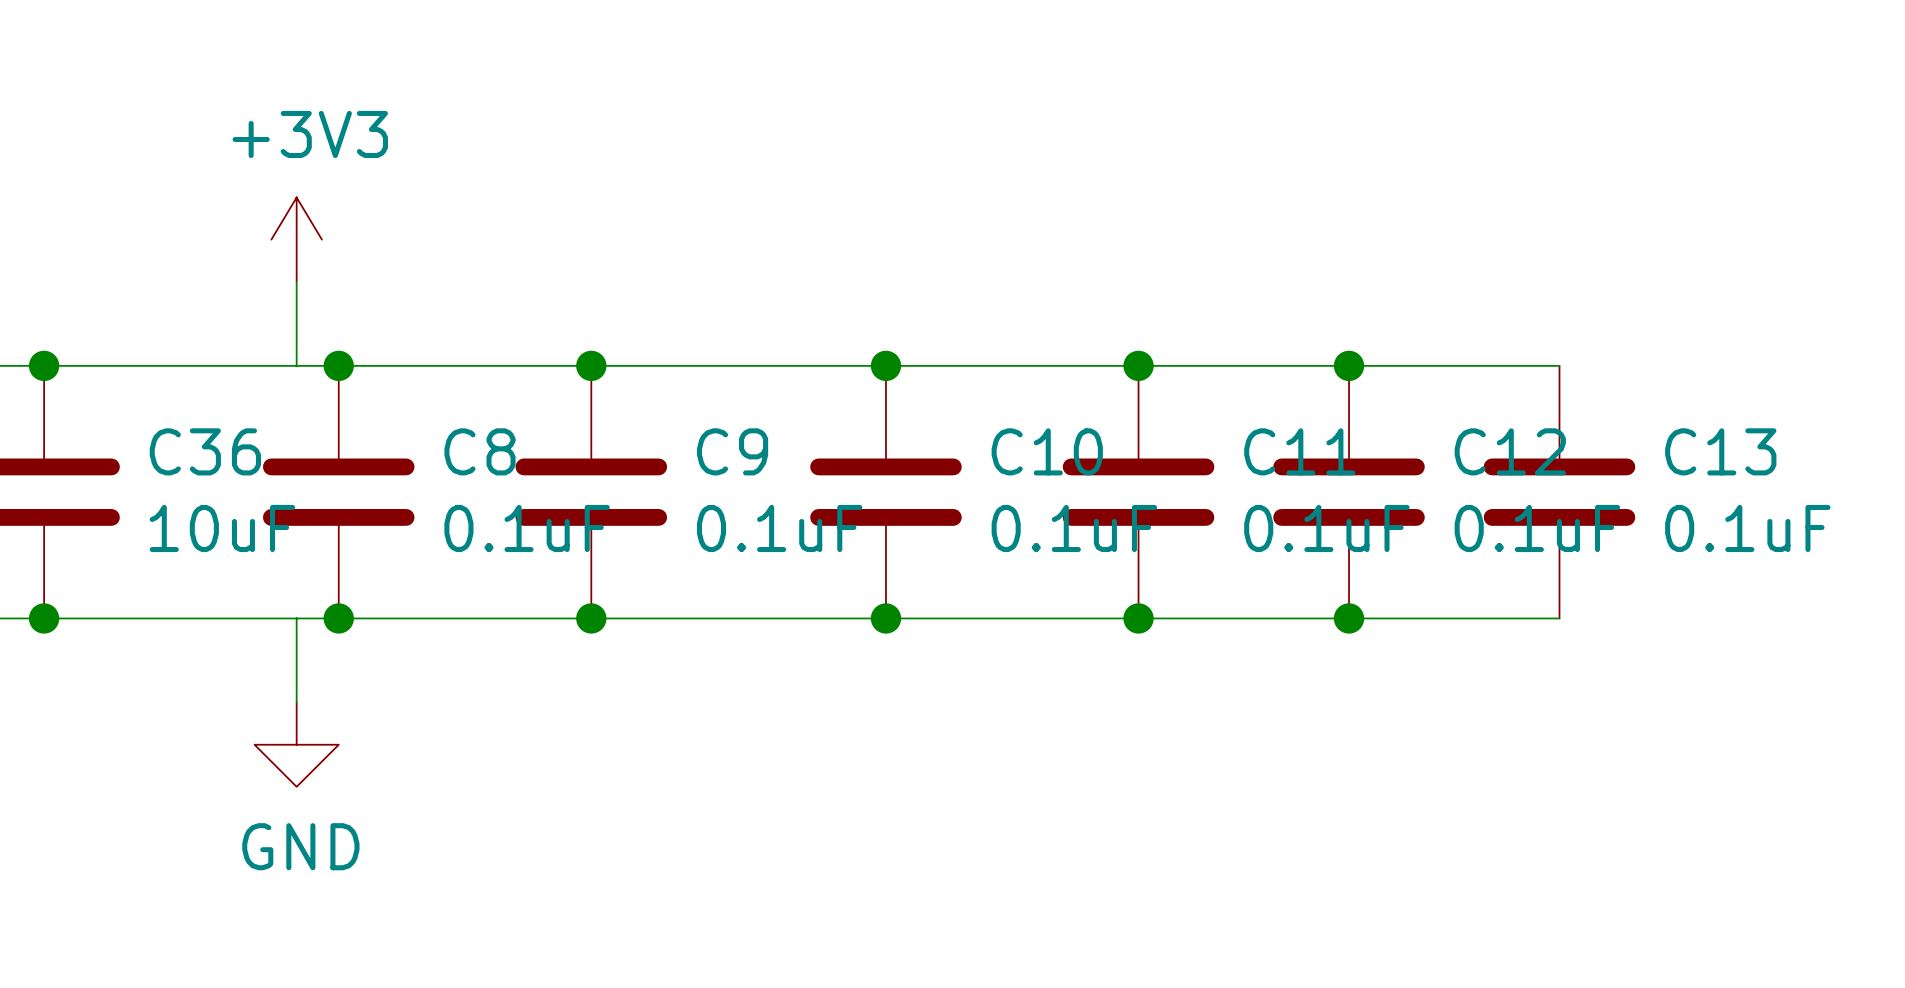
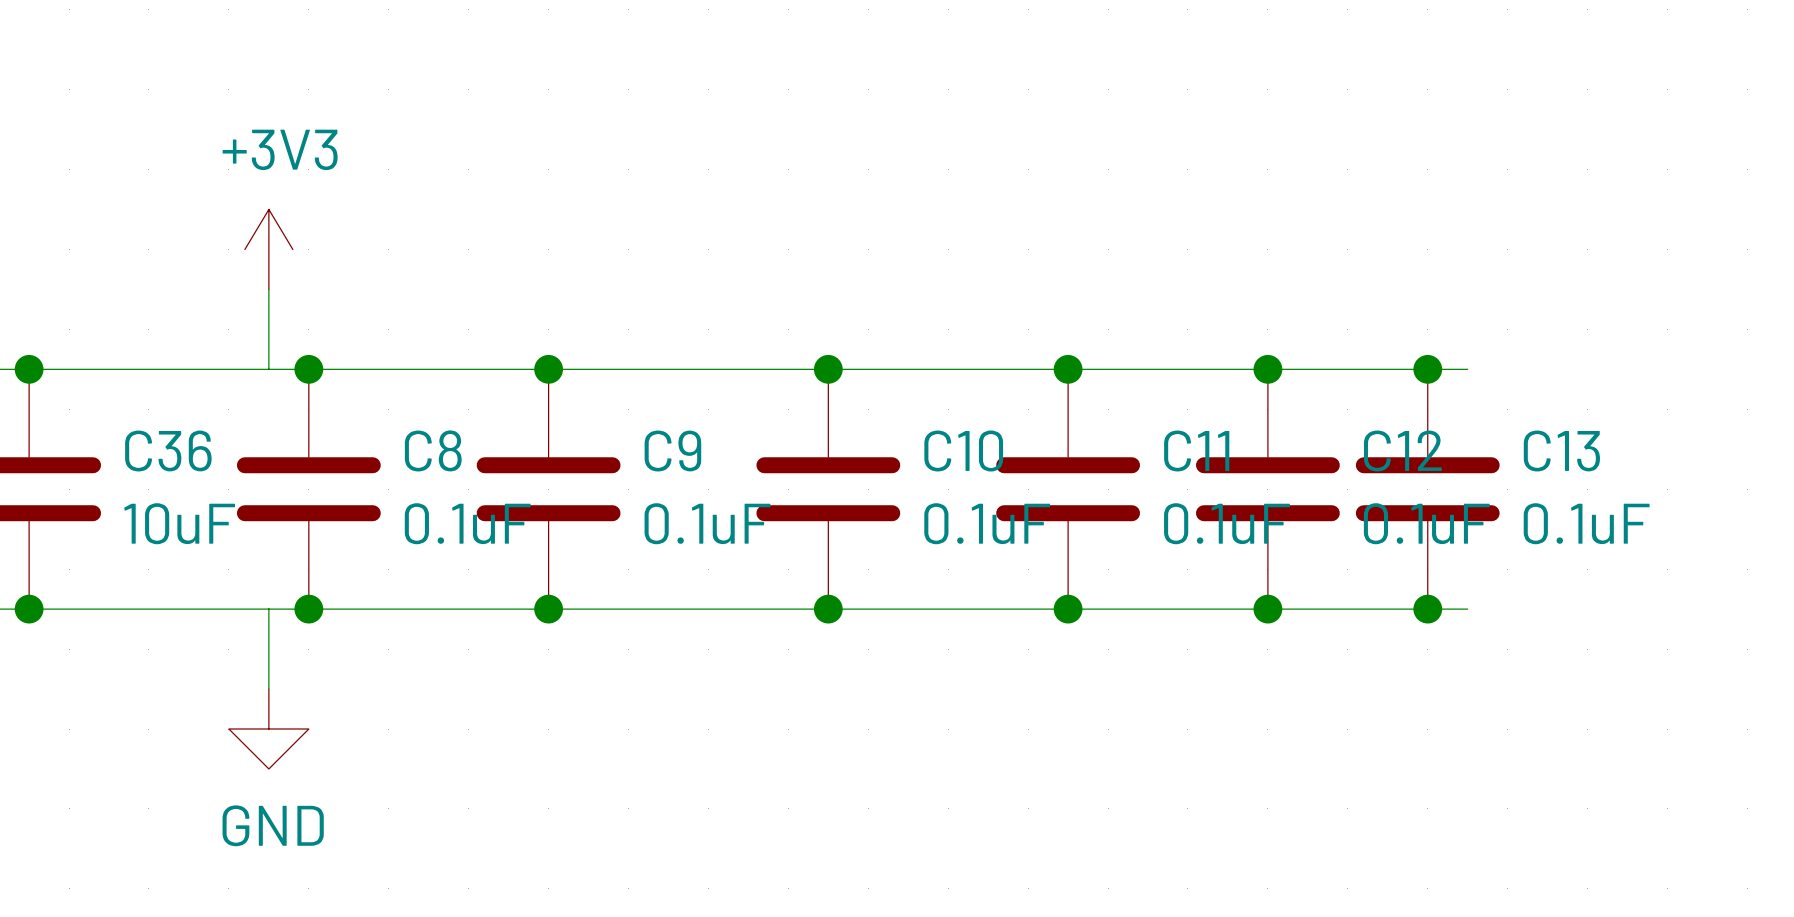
junction: none -> (1427, 369)
C13 position: (1559, 492) -> (1427, 489)
junction: none -> (1427, 609)

